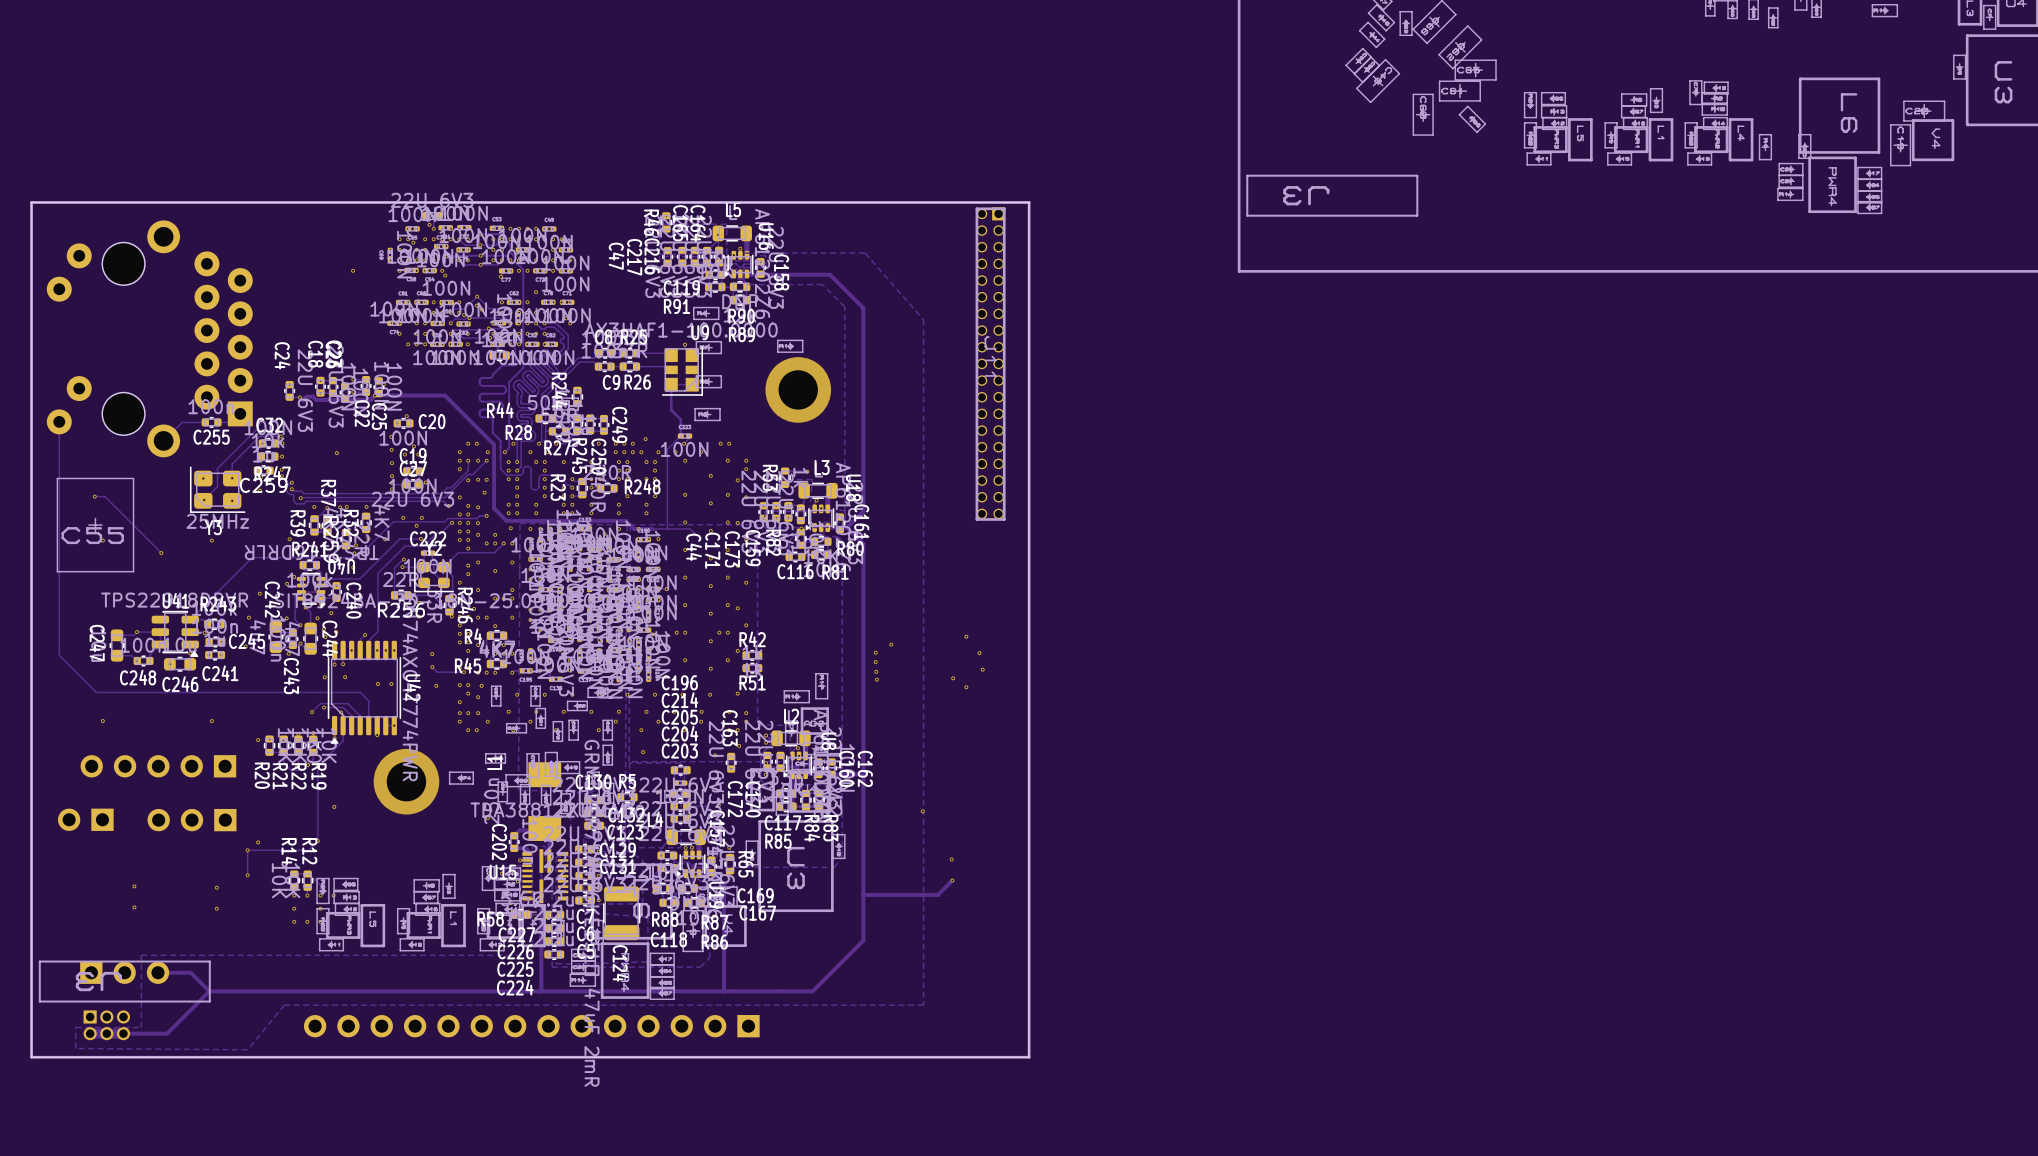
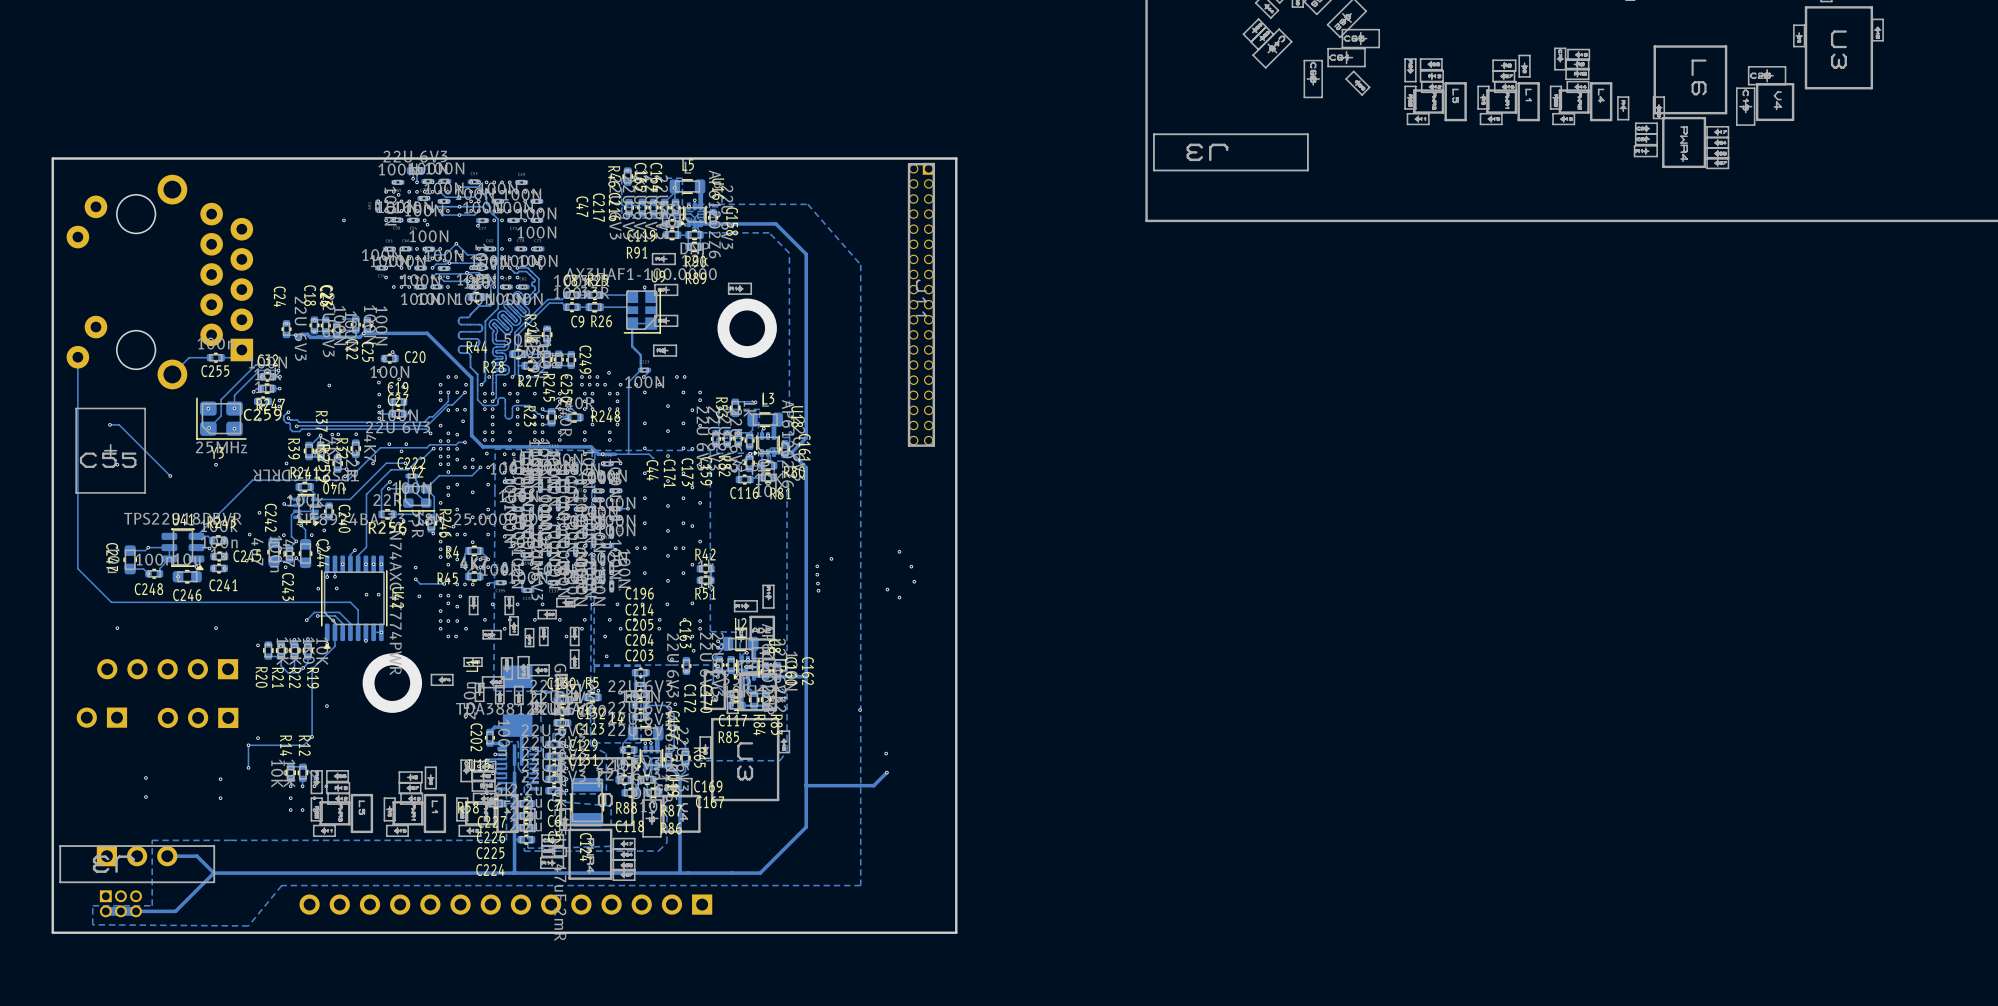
track: none -> (261, 388) (256, 388) (253, 391)
via: none -> (253, 391)

